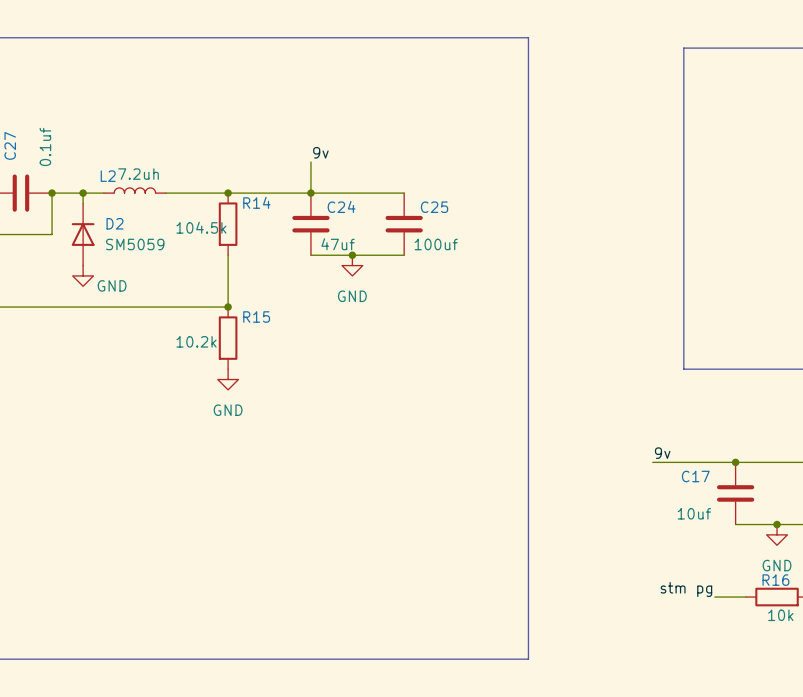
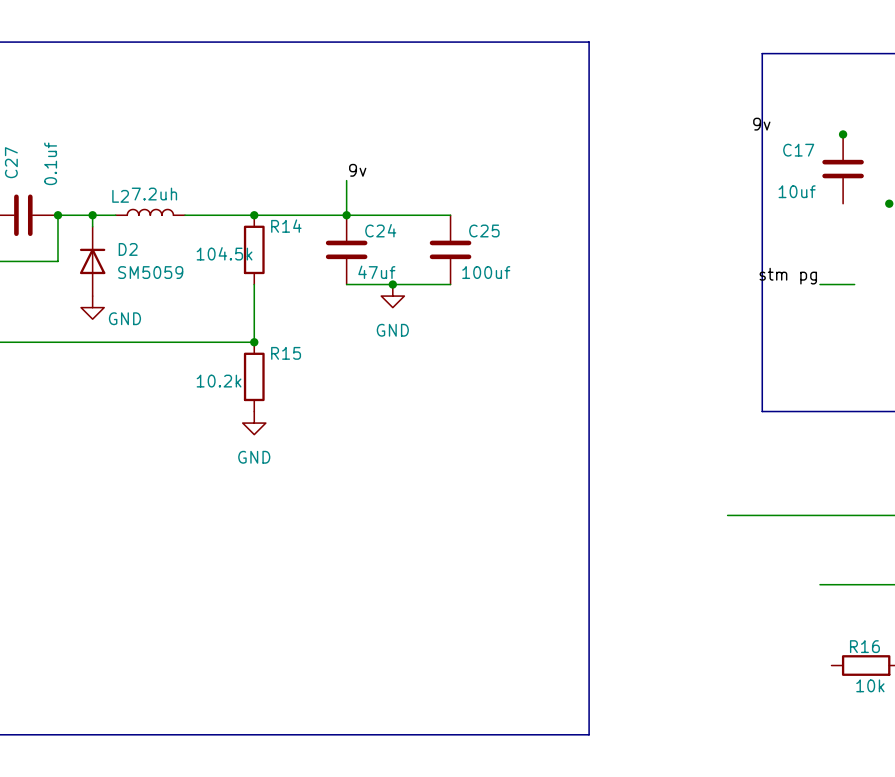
label: none -> 9v (761, 124)
junction: none -> (843, 134)
junction: none -> (889, 203)
label: none -> stm pg (788, 276)
wire: none -> (819, 284) (854, 284)
label: 9v (662, 453) -> none
junction: (735, 462) -> none
C17 position: (735, 493) -> (843, 169)
junction: (777, 524) -> none
power symbol: GND (777, 534) -> none
label: stm pg (686, 589) -> none
wire: (714, 597) (745, 597) -> none

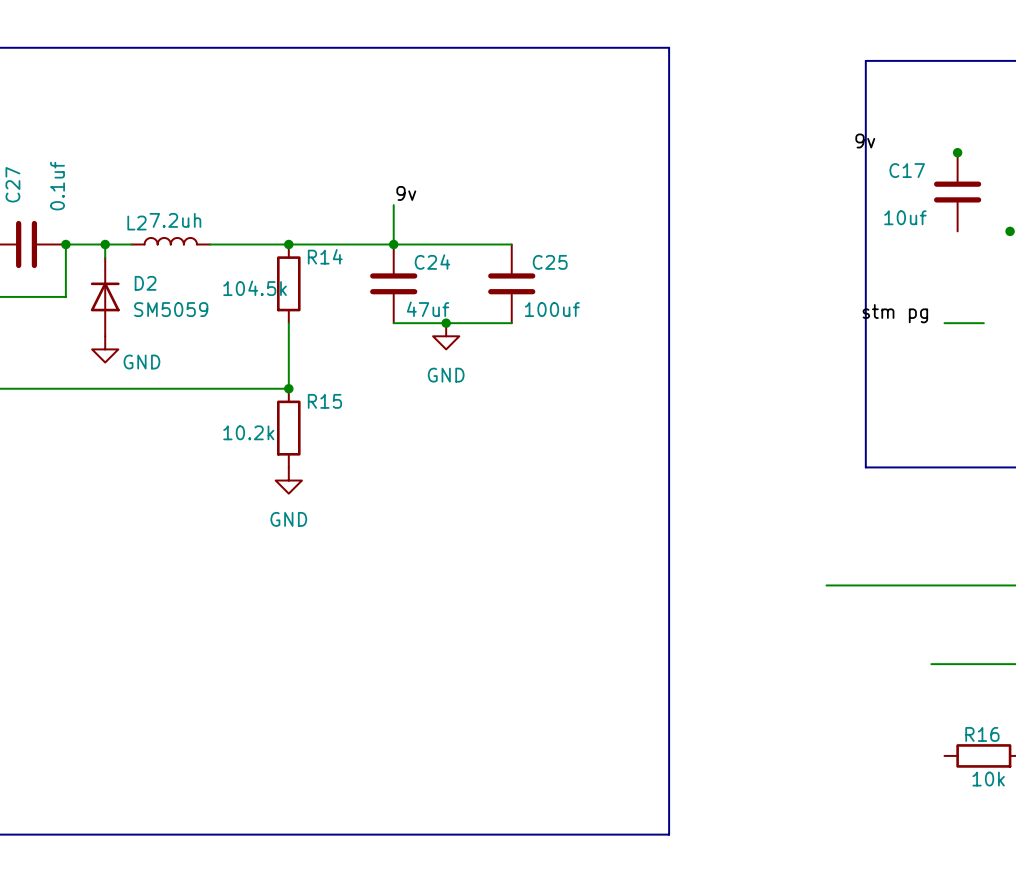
wire: (819, 284) (831, 284) -> (970, 323) (983, 323)

